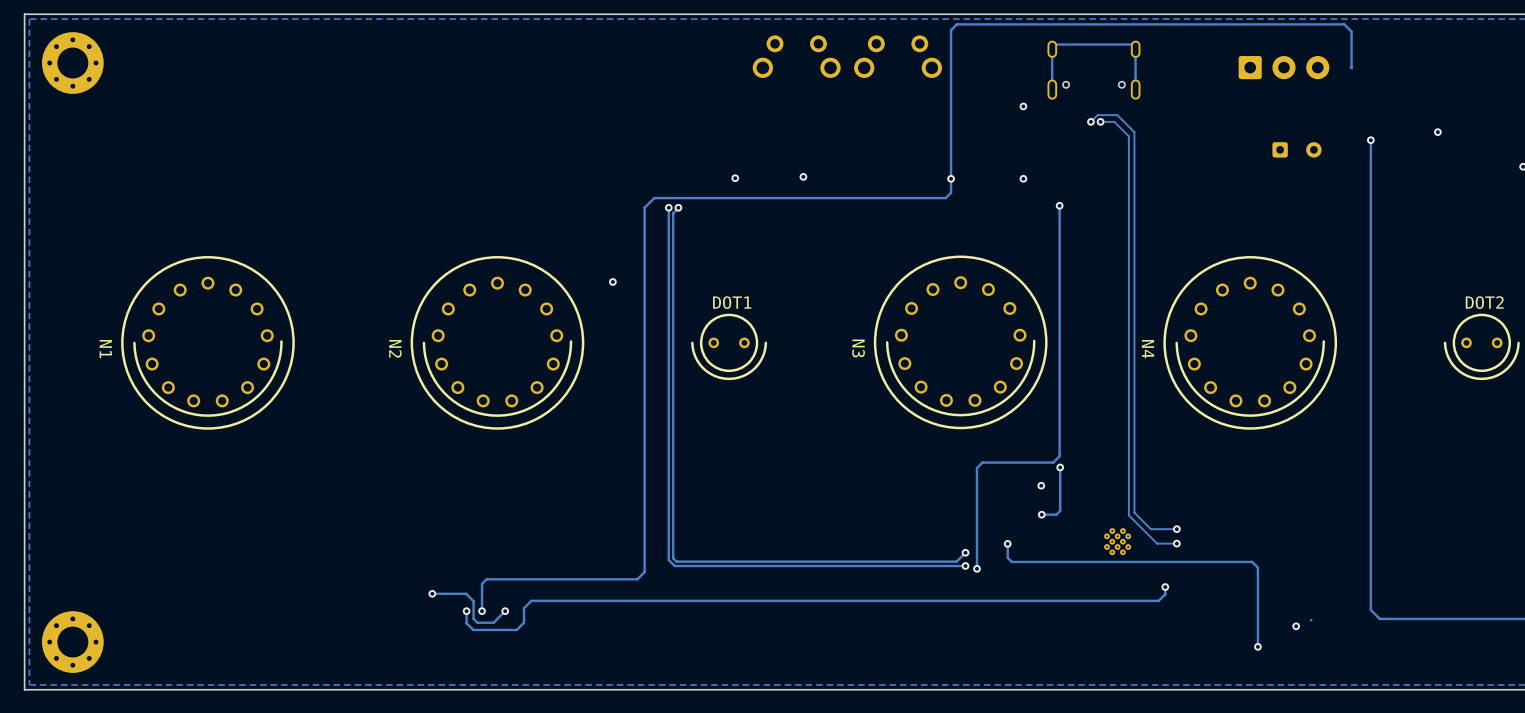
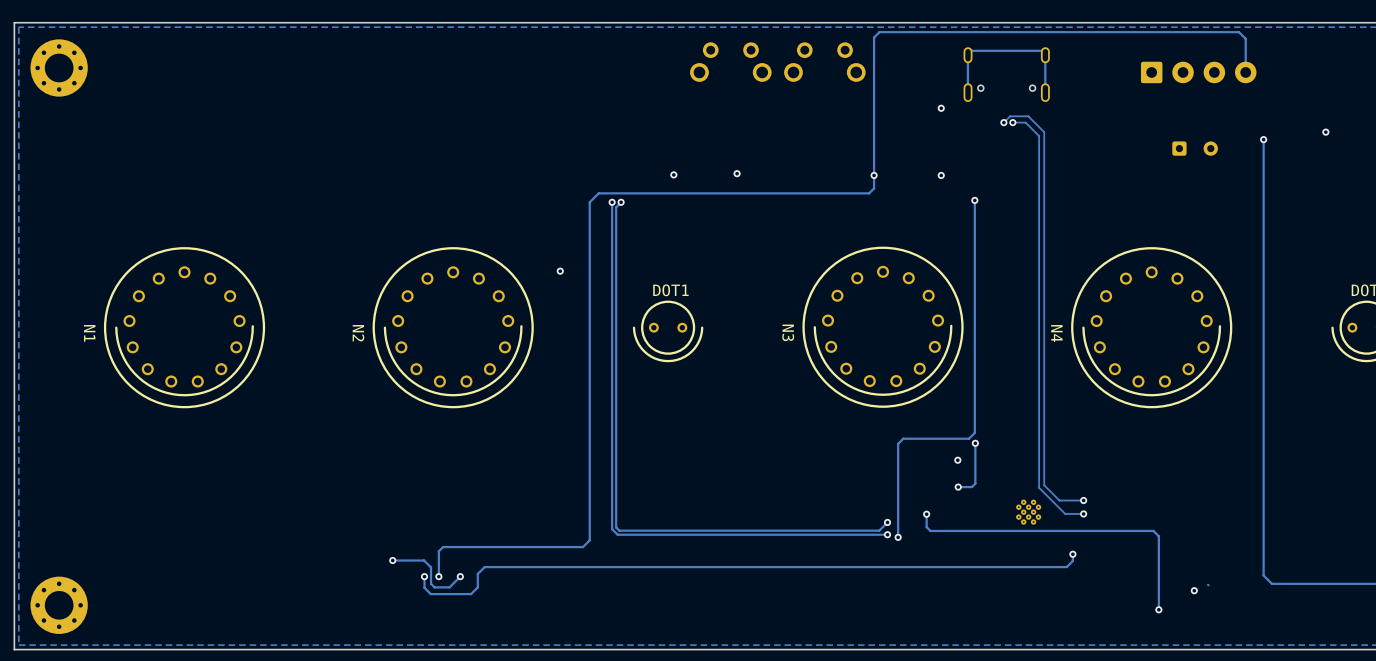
part: (1283, 67) -> none
part: none -> (1198, 72)

